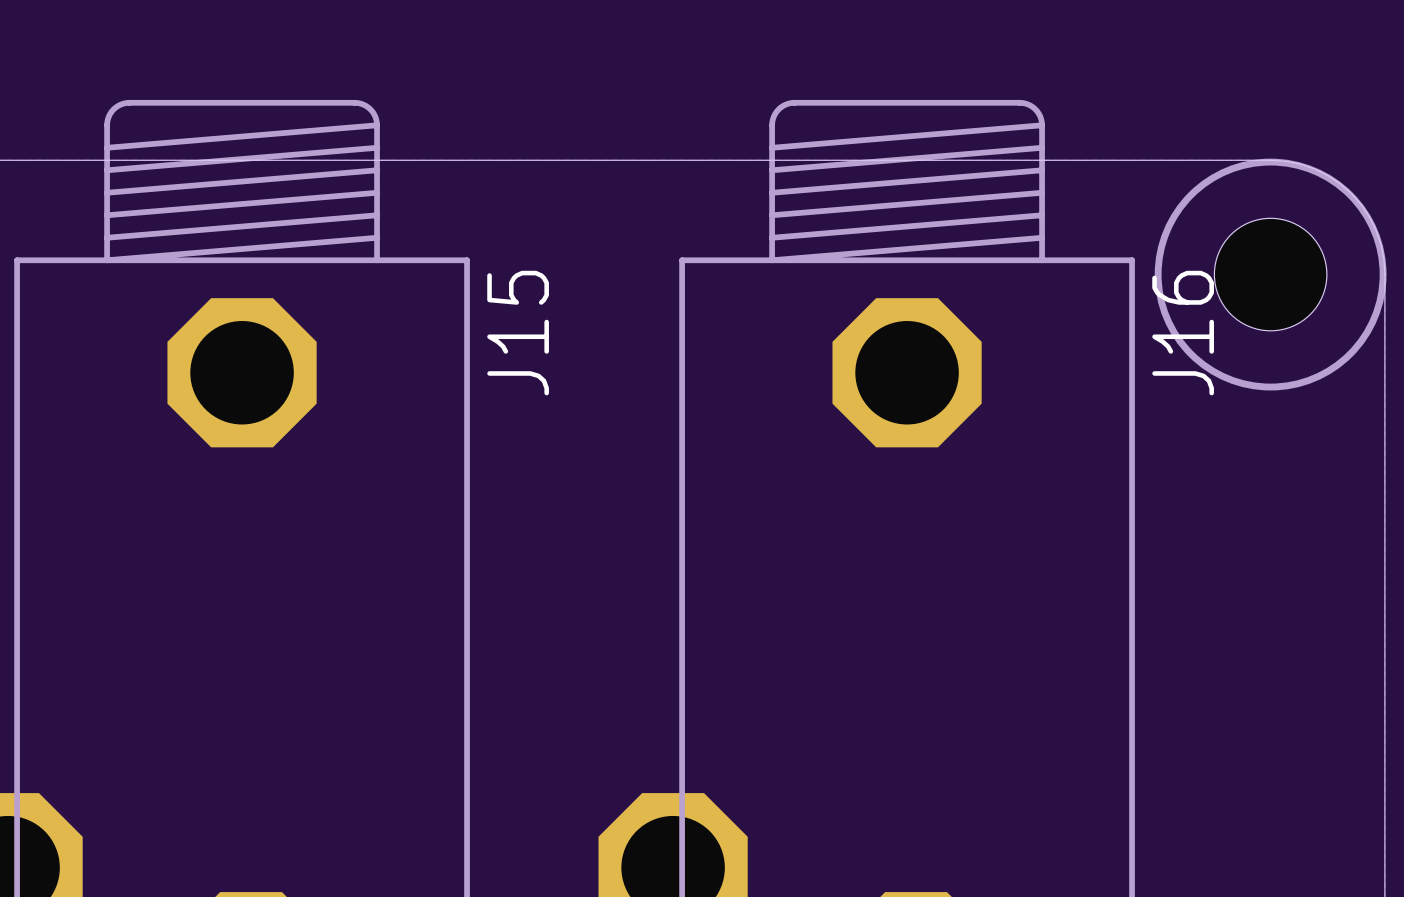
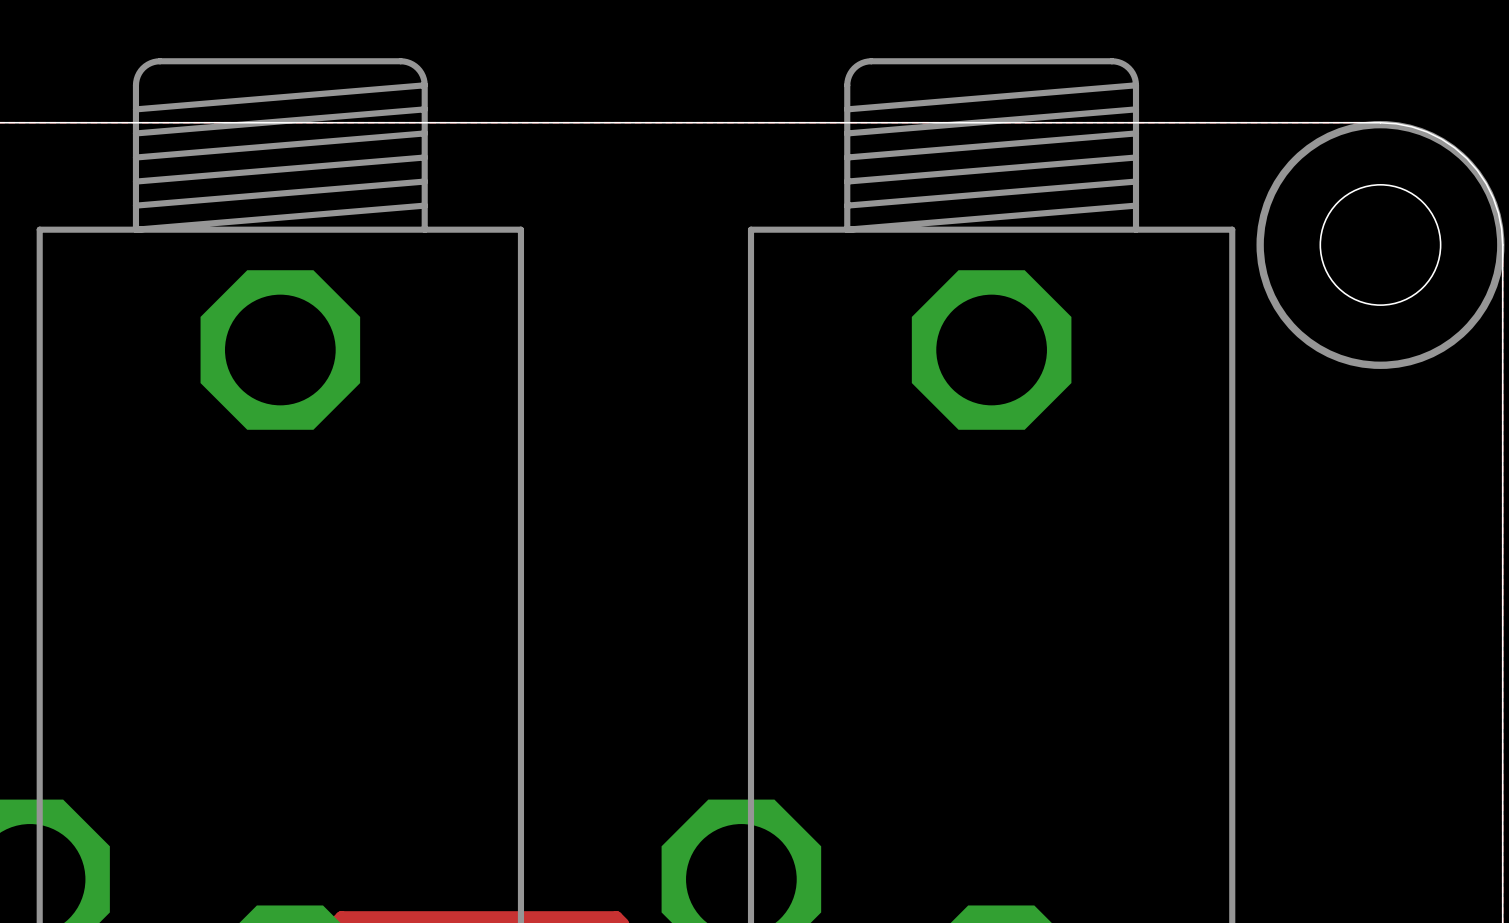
J15 name: J15 (518, 333) -> none
J16 name: J16 (1183, 333) -> none

